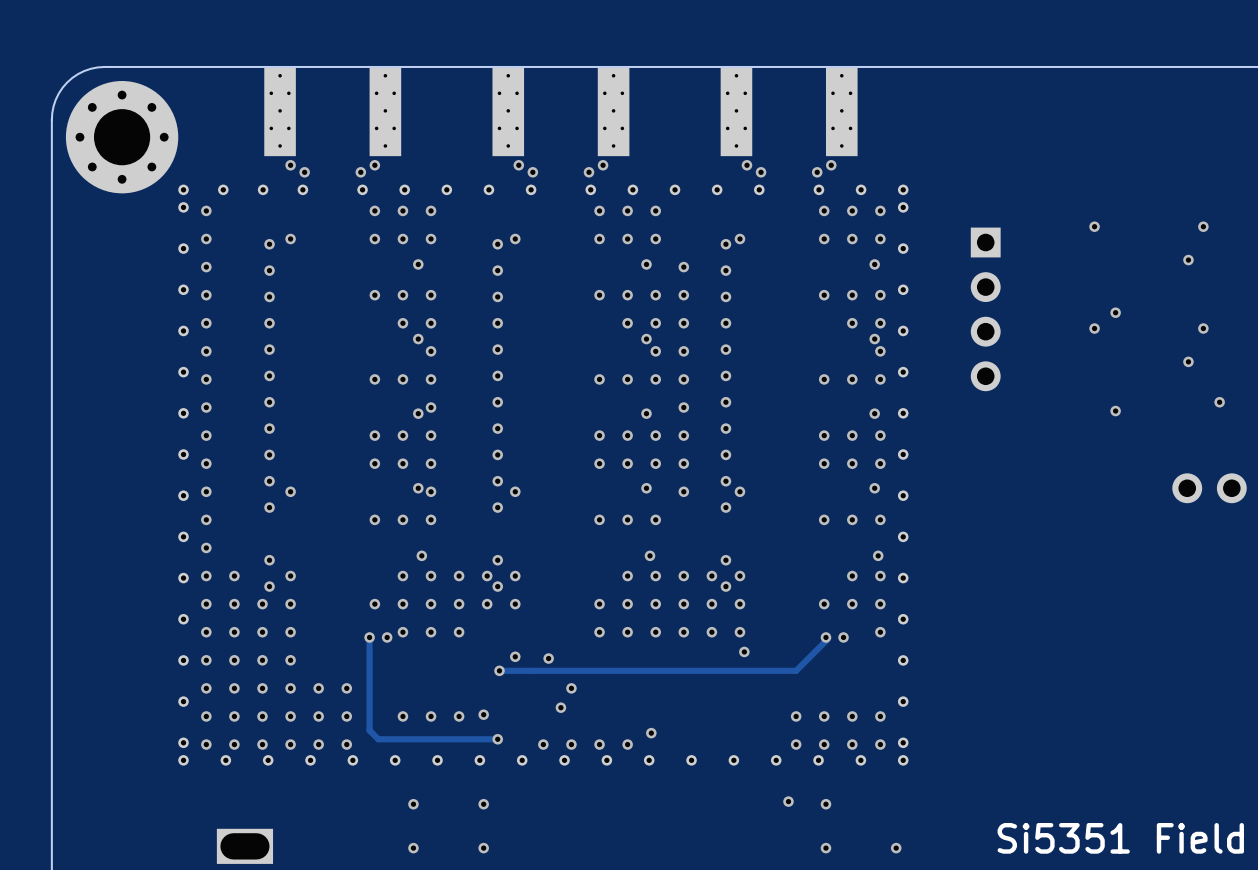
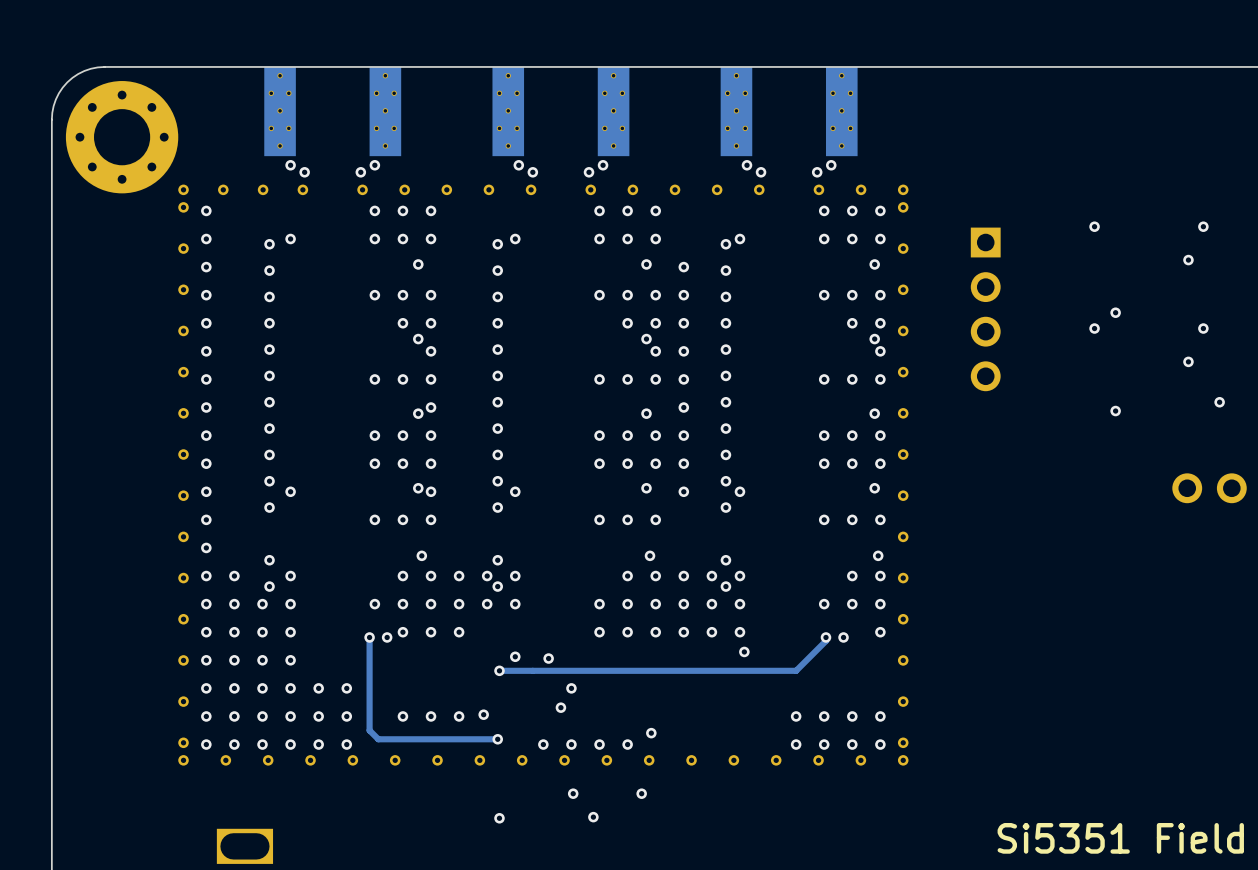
via: none -> (573, 793)
via: none -> (641, 793)
via: (788, 801) -> none
via: (413, 804) -> none
via: (483, 804) -> none
via: (825, 804) -> none
via: none -> (593, 817)
via: none -> (499, 818)
via: (413, 848) -> none
via: (483, 848) -> none
via: (825, 848) -> none
via: (896, 848) -> none

